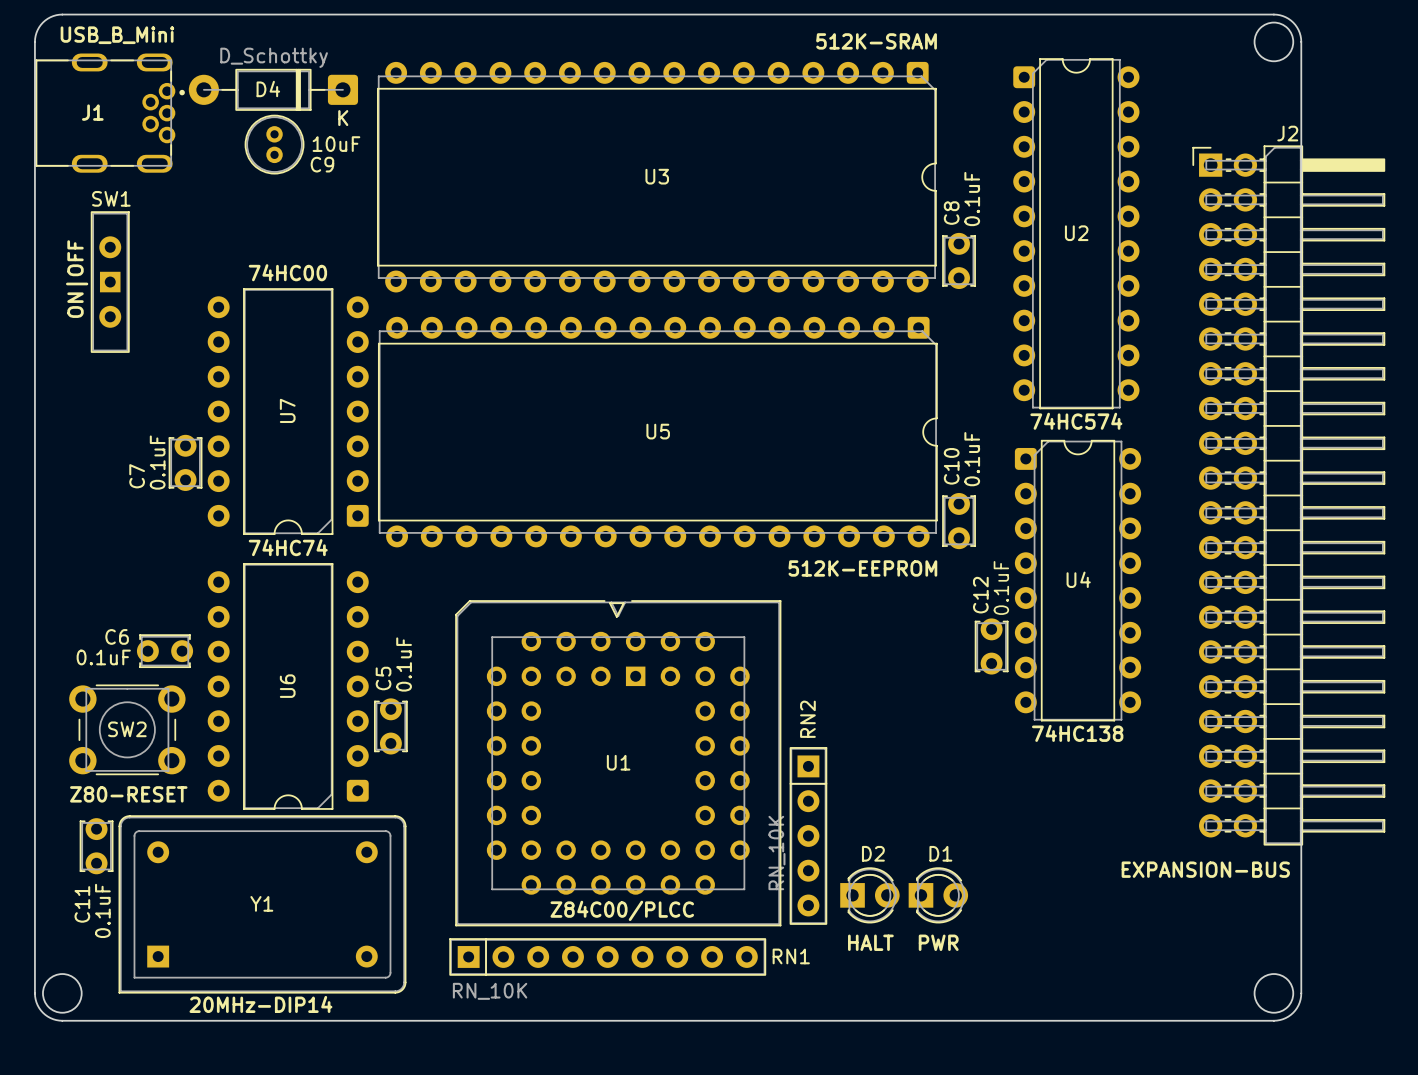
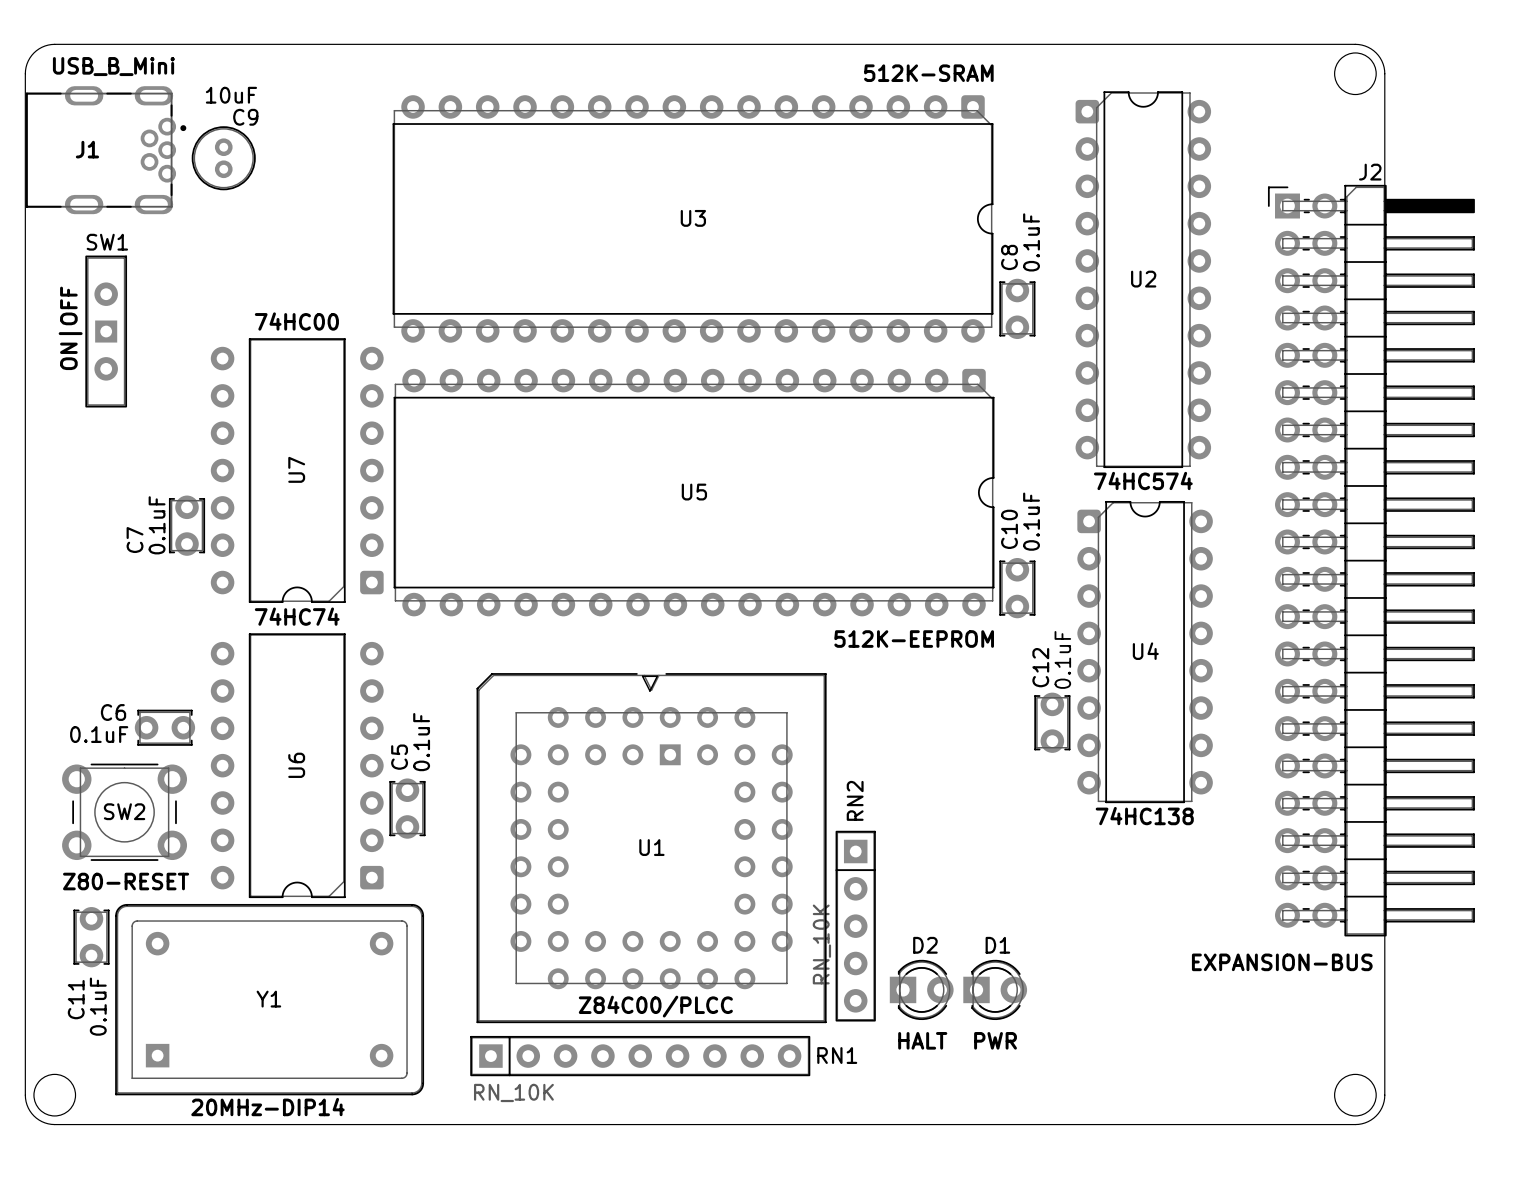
D4: D_Schottky (273, 89) -> none
C9 position: (274, 144) -> (223, 158)
C9 value position: 10uF (336, 144) -> 10uF (231, 95)
C9 name position: C9 (322, 164) -> C9 (245, 117)

